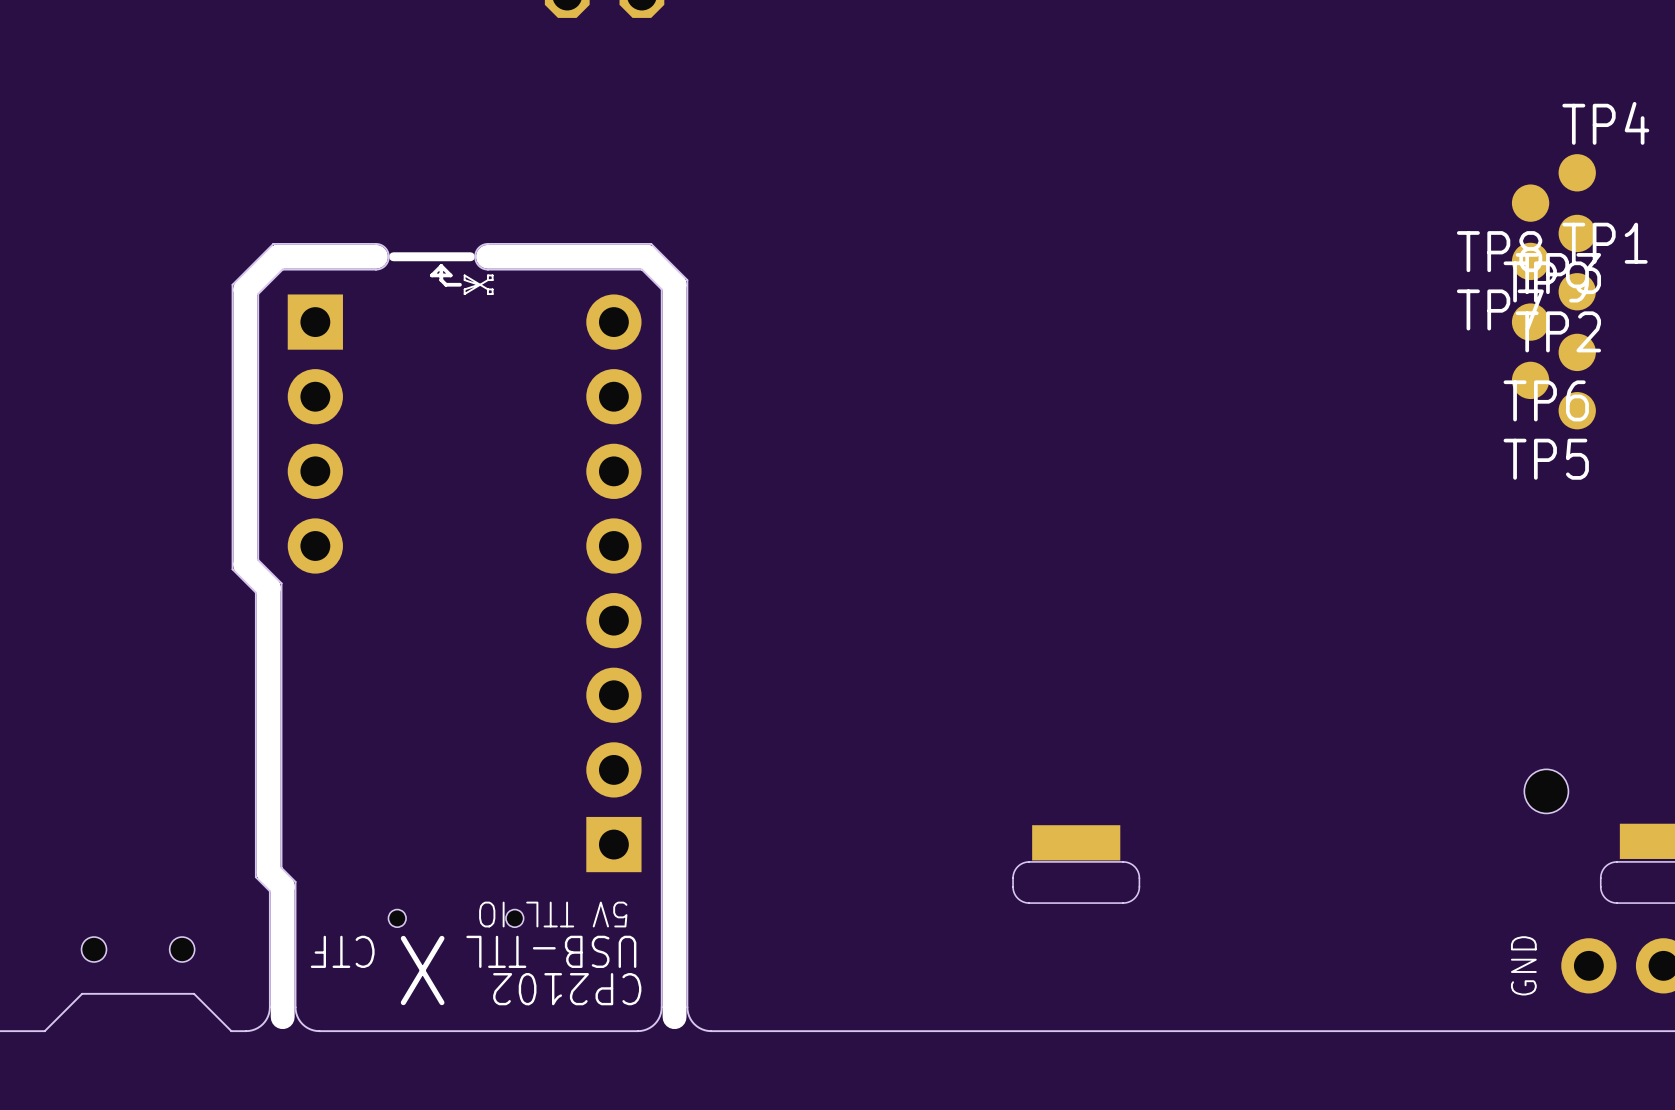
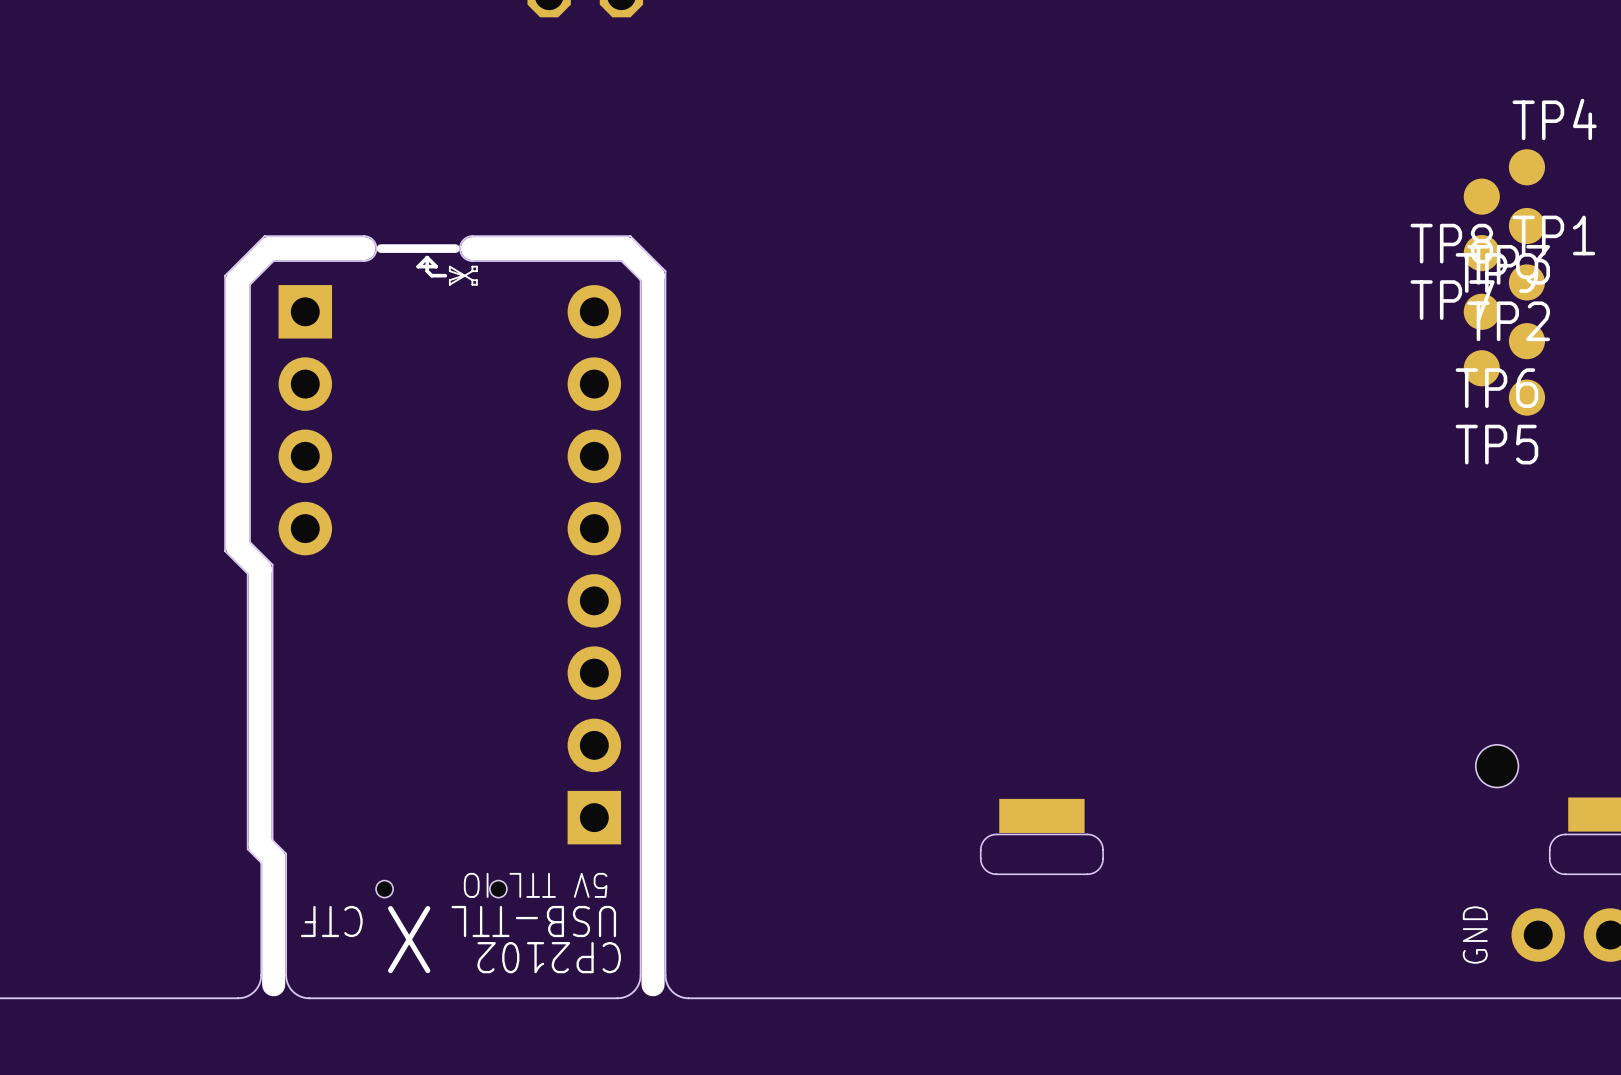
part: (138, 949) -> none
board edge: (231, 1031) (194, 993) (82, 993) (44, 1031) -> (224, 998) (43, 998)

